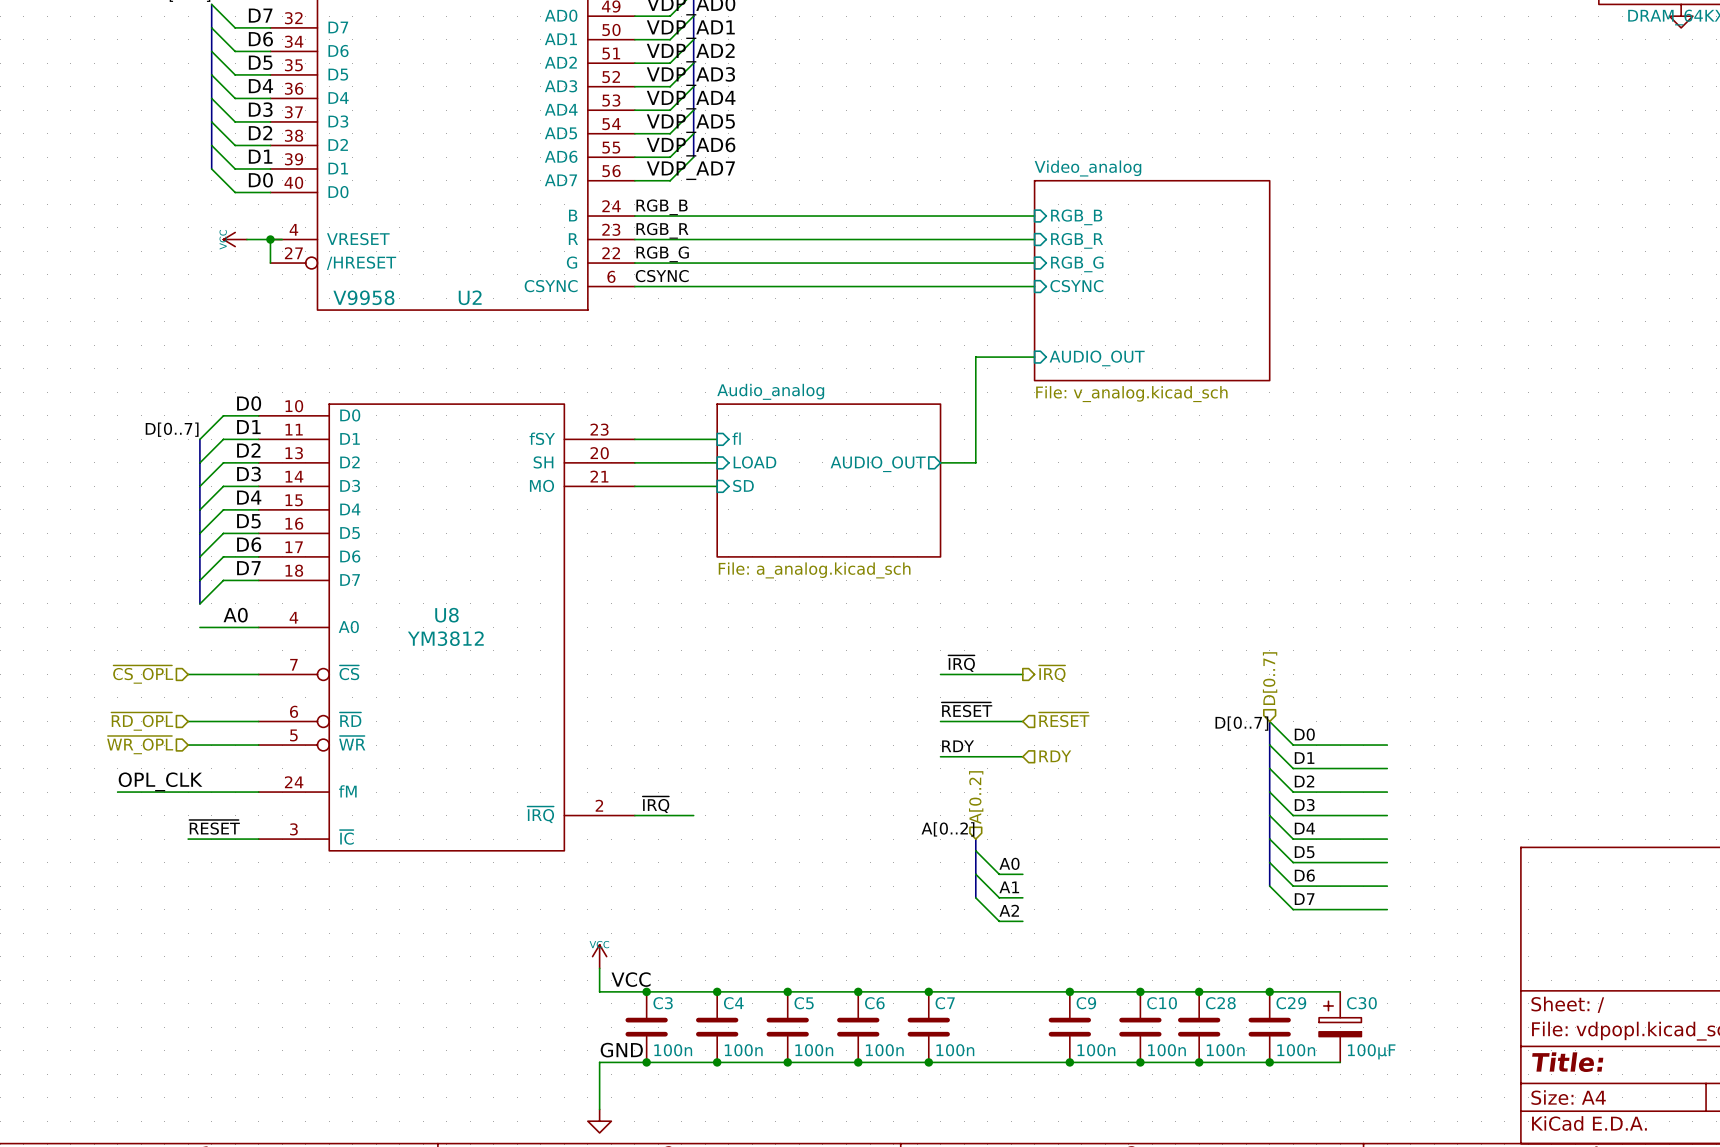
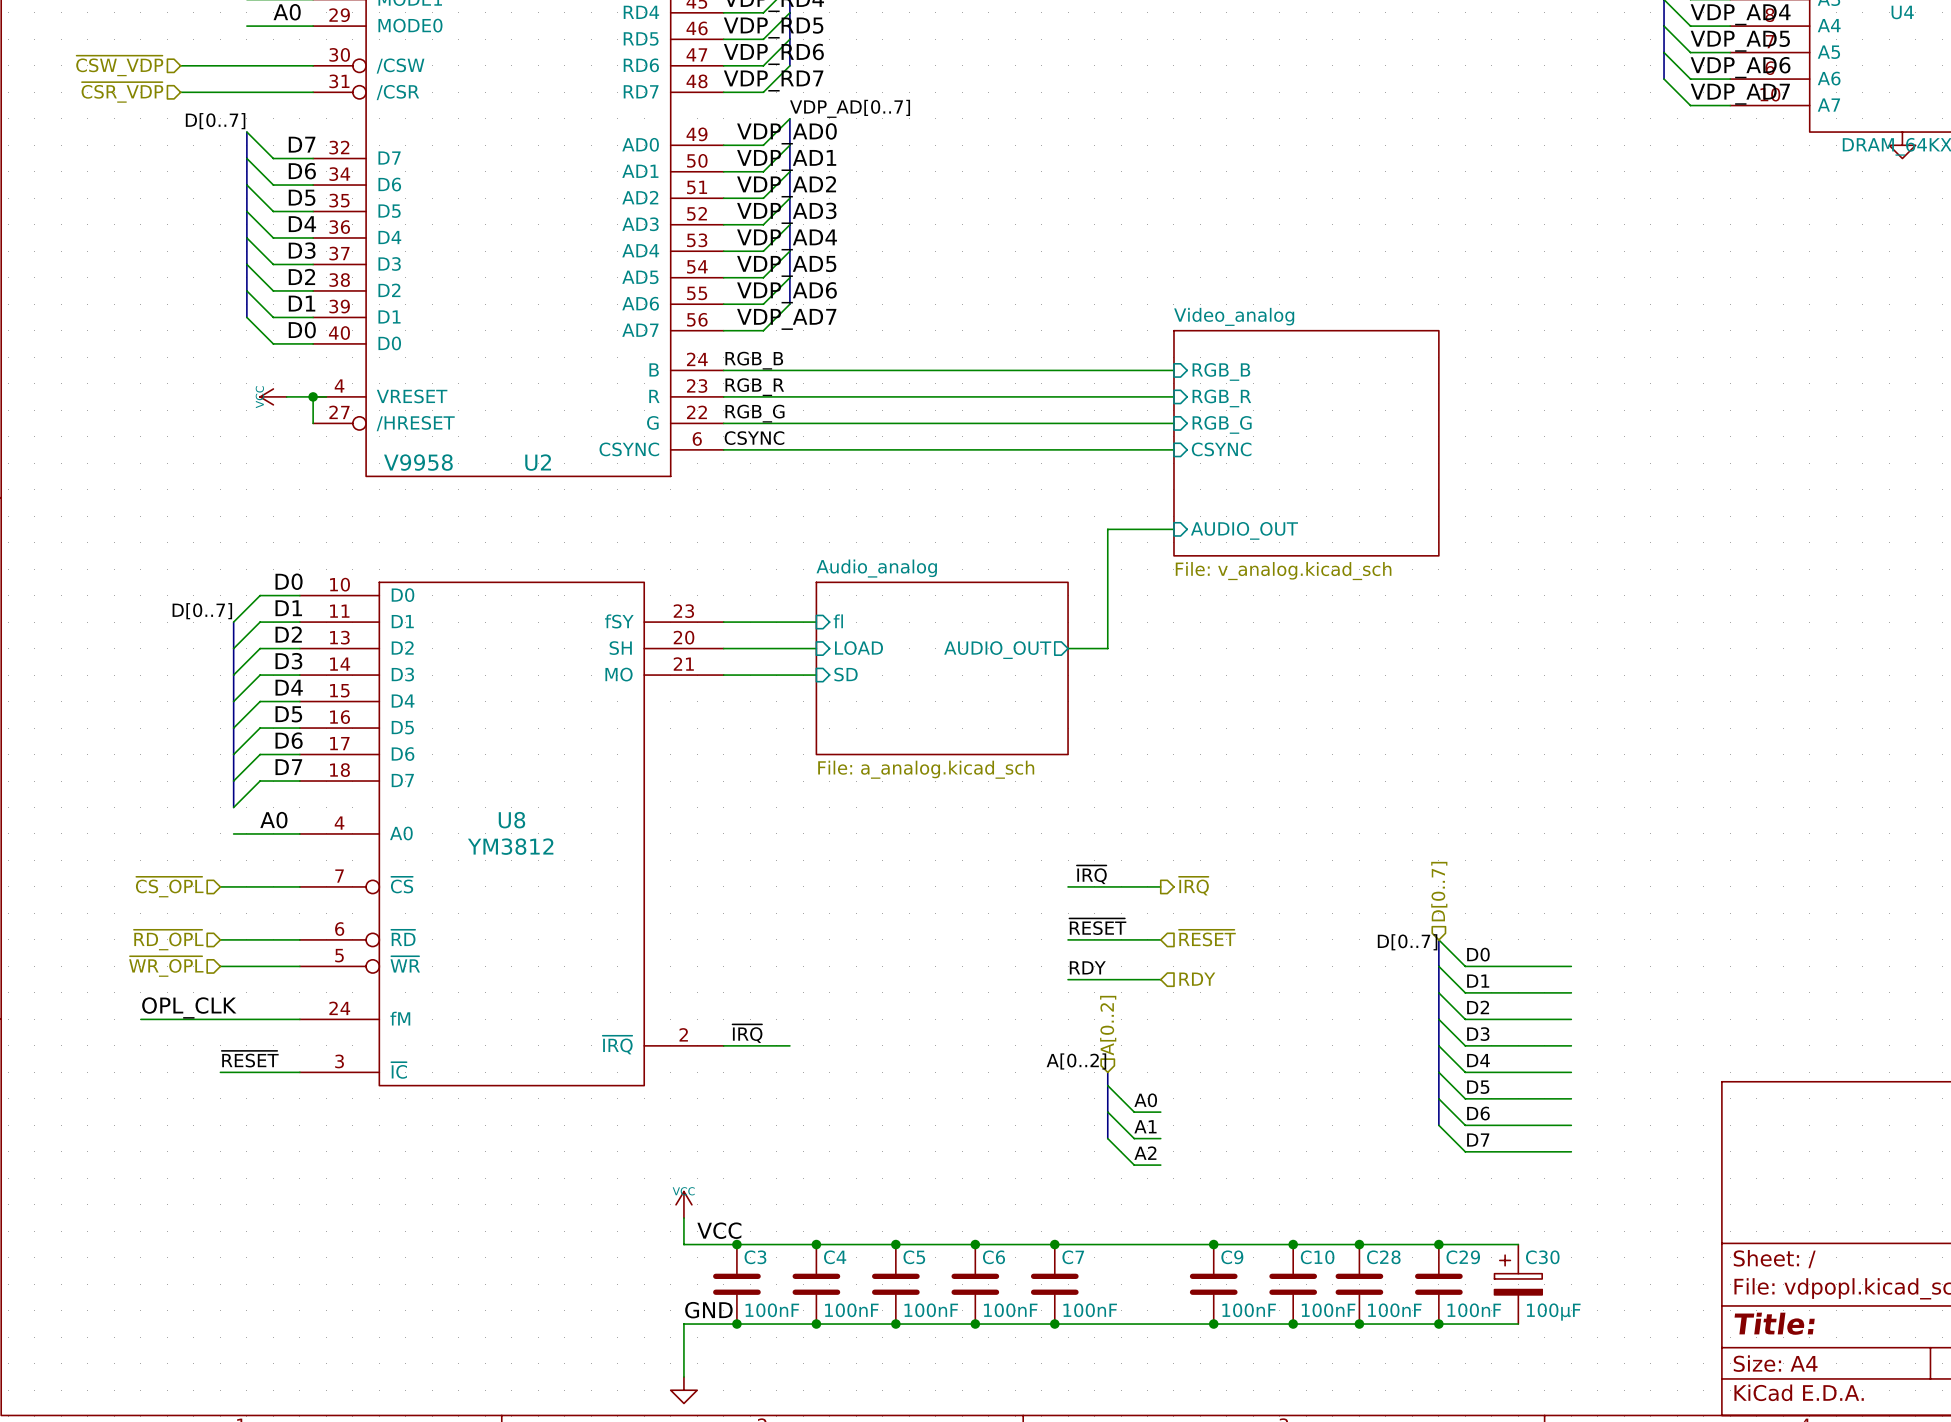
C3 value: 100n (673, 1050) -> 100nF (772, 1310)
C4 value: 100n (743, 1050) -> 100nF (851, 1310)
C5 value: 100n (814, 1050) -> 100nF (931, 1310)
C6 value: 100n (884, 1050) -> 100nF (1010, 1310)
C7 value: 100n (955, 1050) -> 100nF (1090, 1310)
C9 value: 100n (1096, 1050) -> 100nF (1249, 1310)
C10 value: 100n (1166, 1050) -> 100nF (1328, 1310)
C28 value: 100n (1225, 1050) -> 100nF (1394, 1310)
C29 value: 100n (1296, 1050) -> 100nF (1474, 1310)

